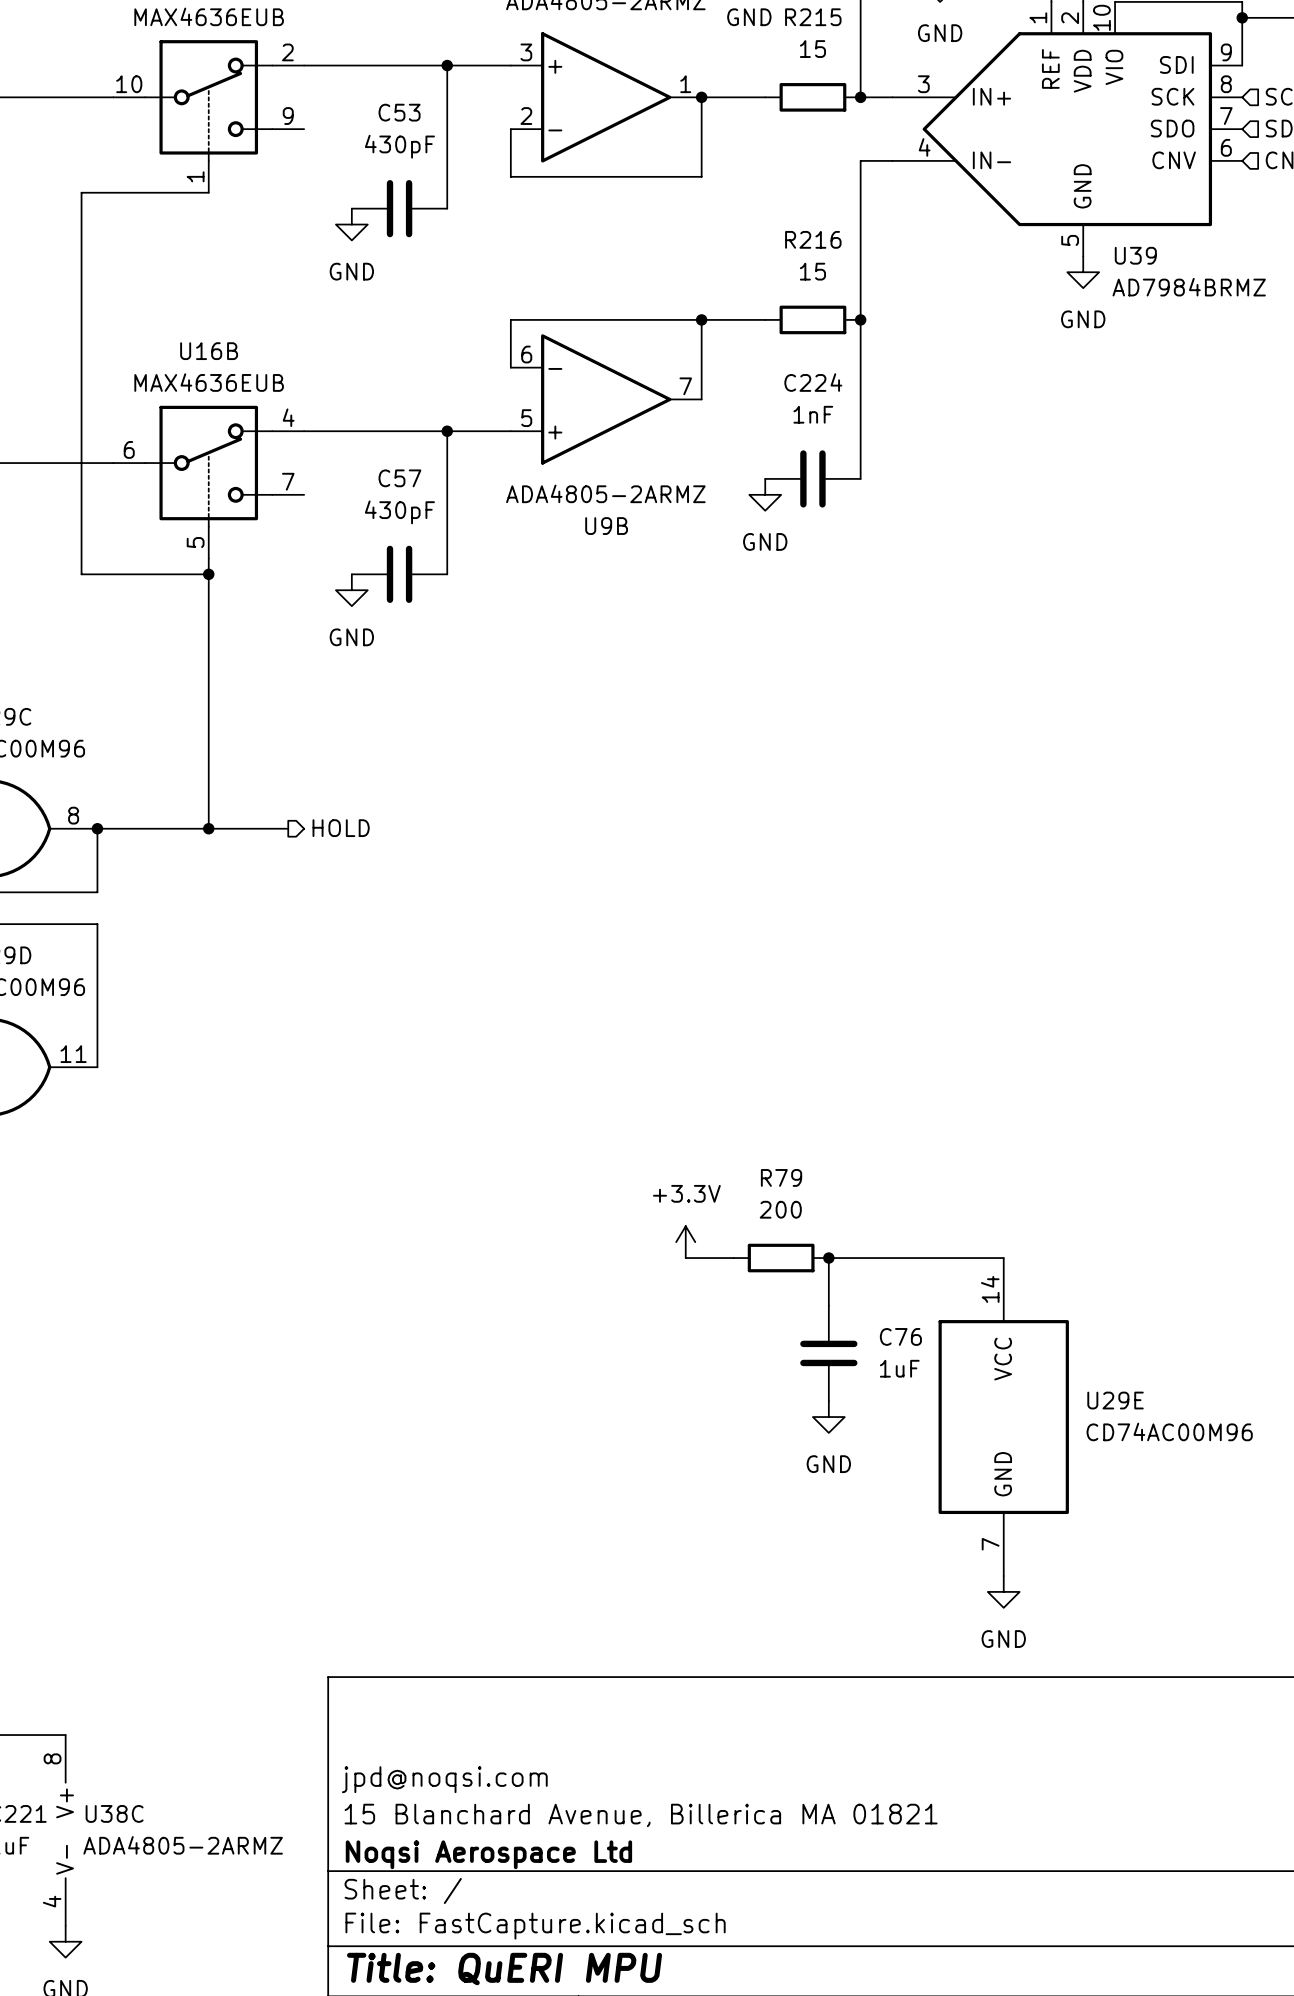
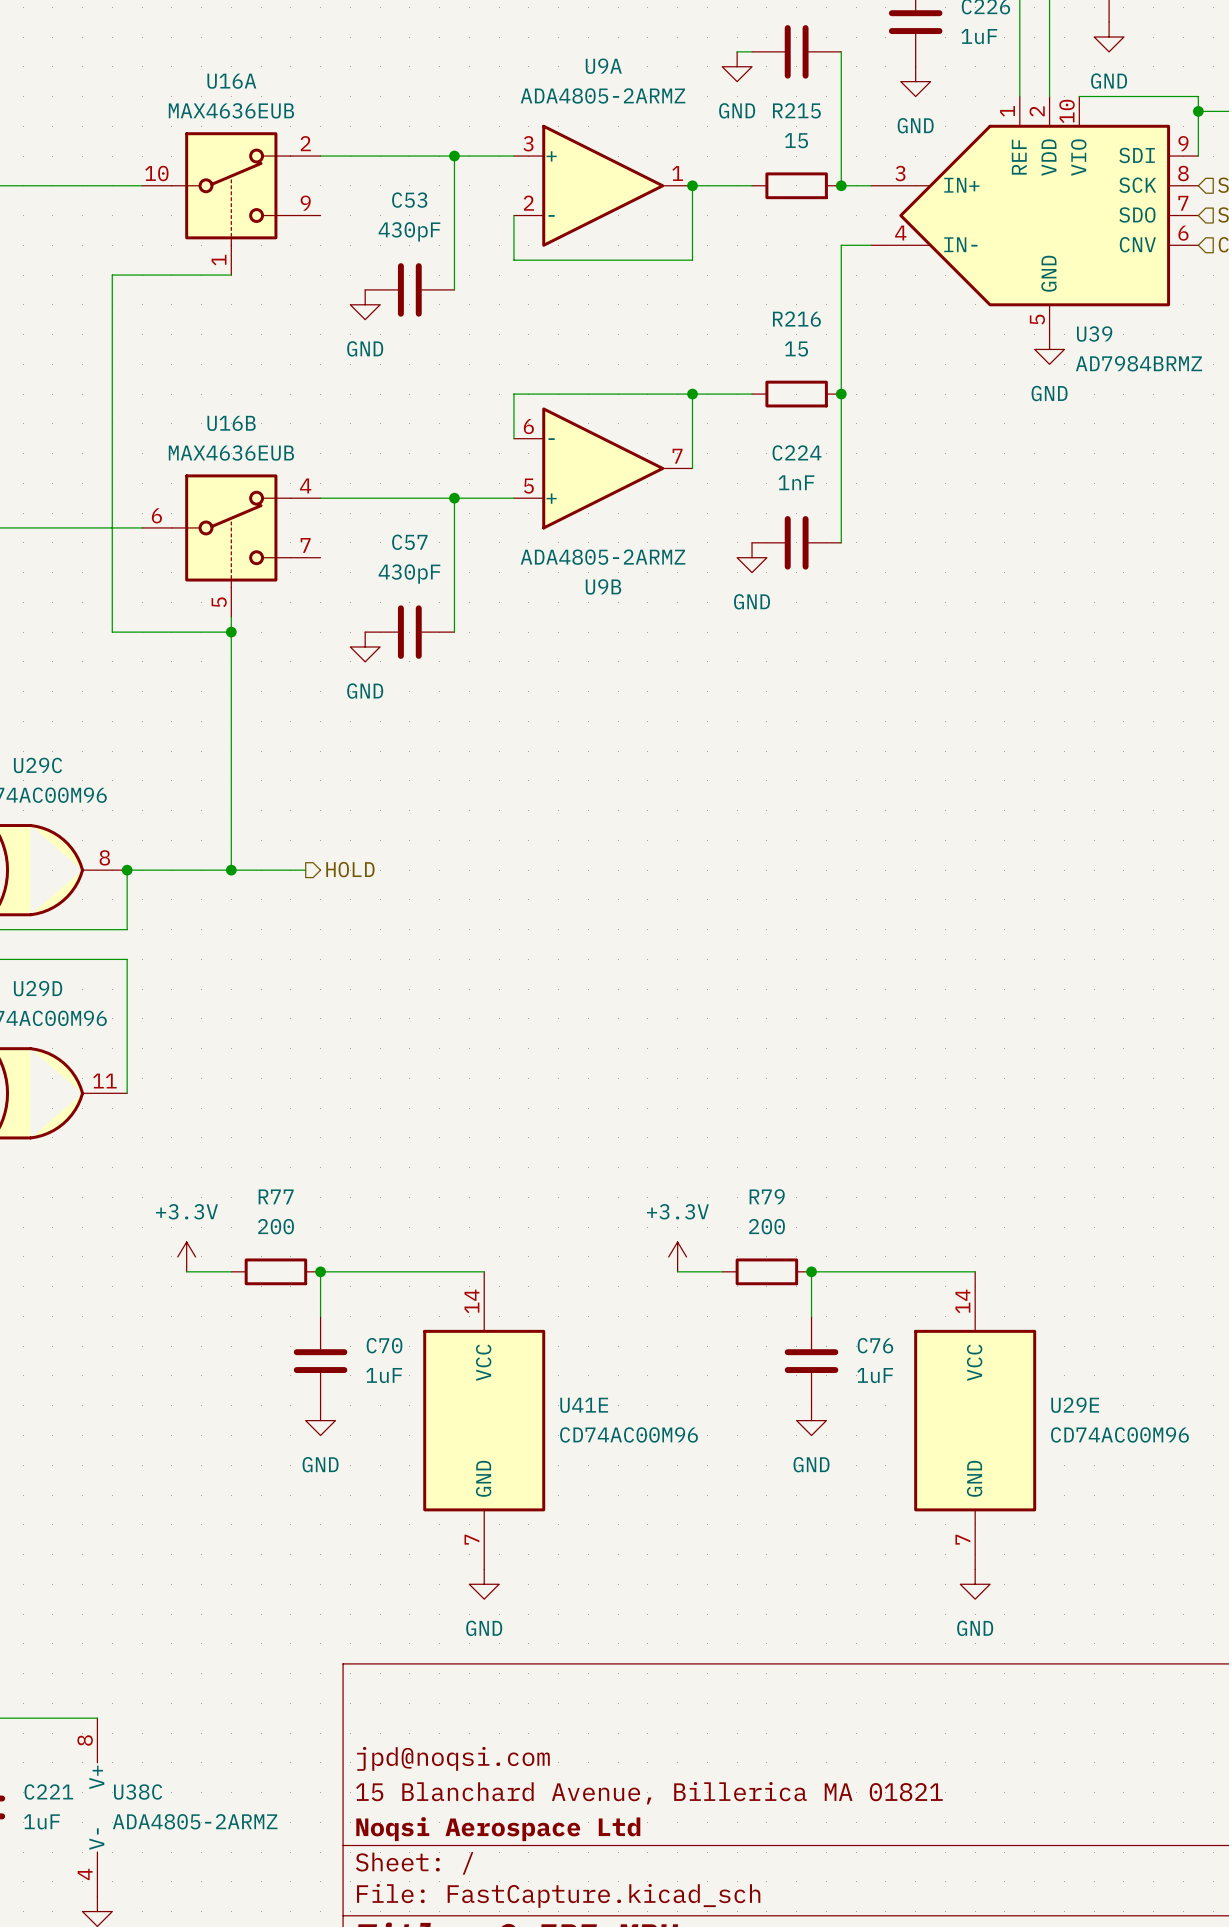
power symbol: none -> +3.3V (186, 1256)
wire: none -> (186, 1271) (231, 1271)
R77: none -> 200 (275, 1271)
junction: none -> (320, 1271)
wire: none -> (484, 1271) (320, 1271) (320, 1316)
C70: none -> 1uF (320, 1361)
power symbol: none -> GND (320, 1420)
U41E: none -> CD74AC00M96 (484, 1420)
power symbol: none -> GND (484, 1584)

